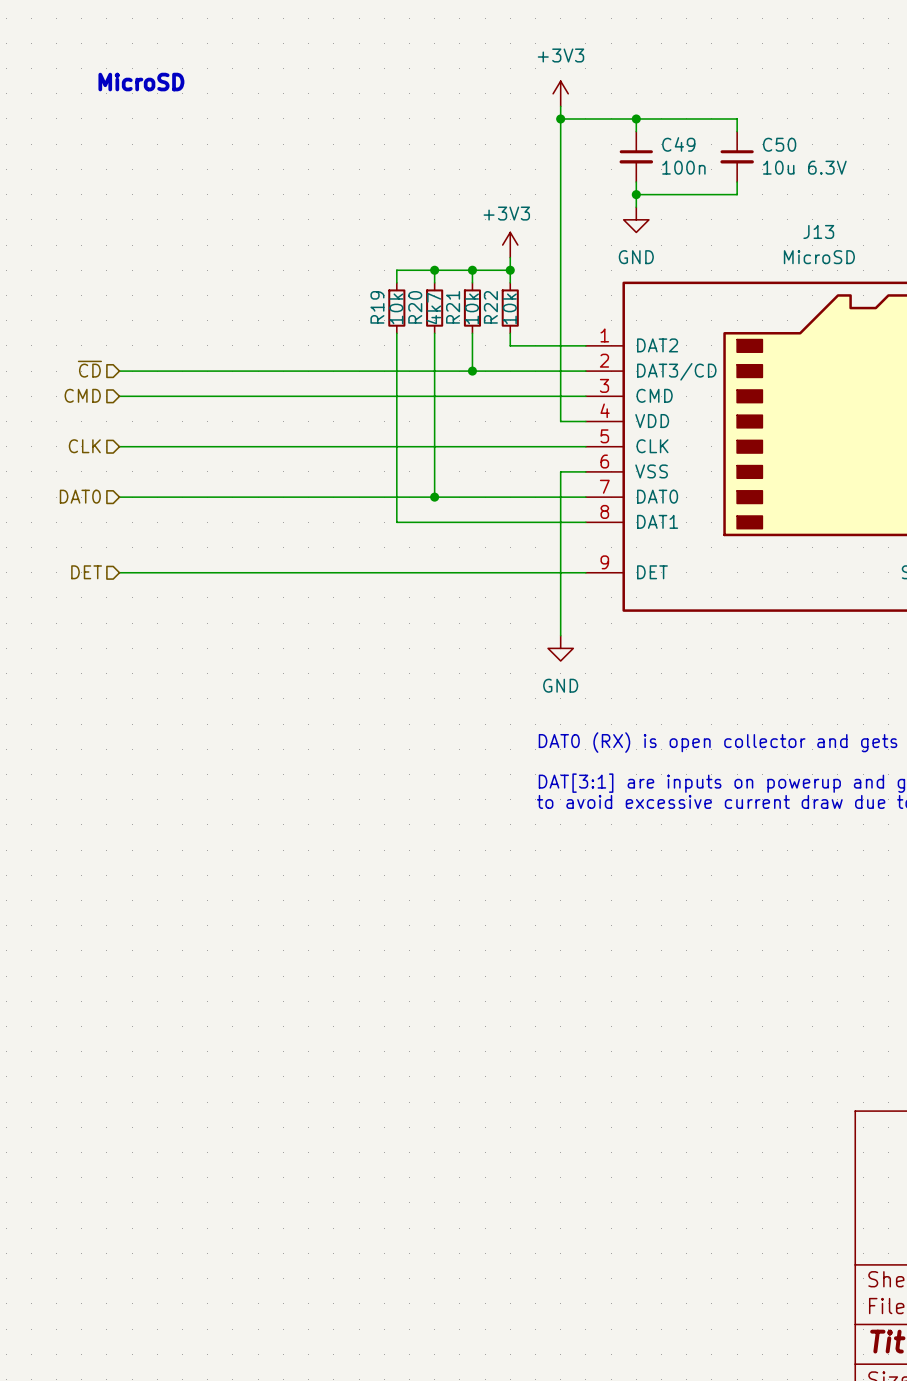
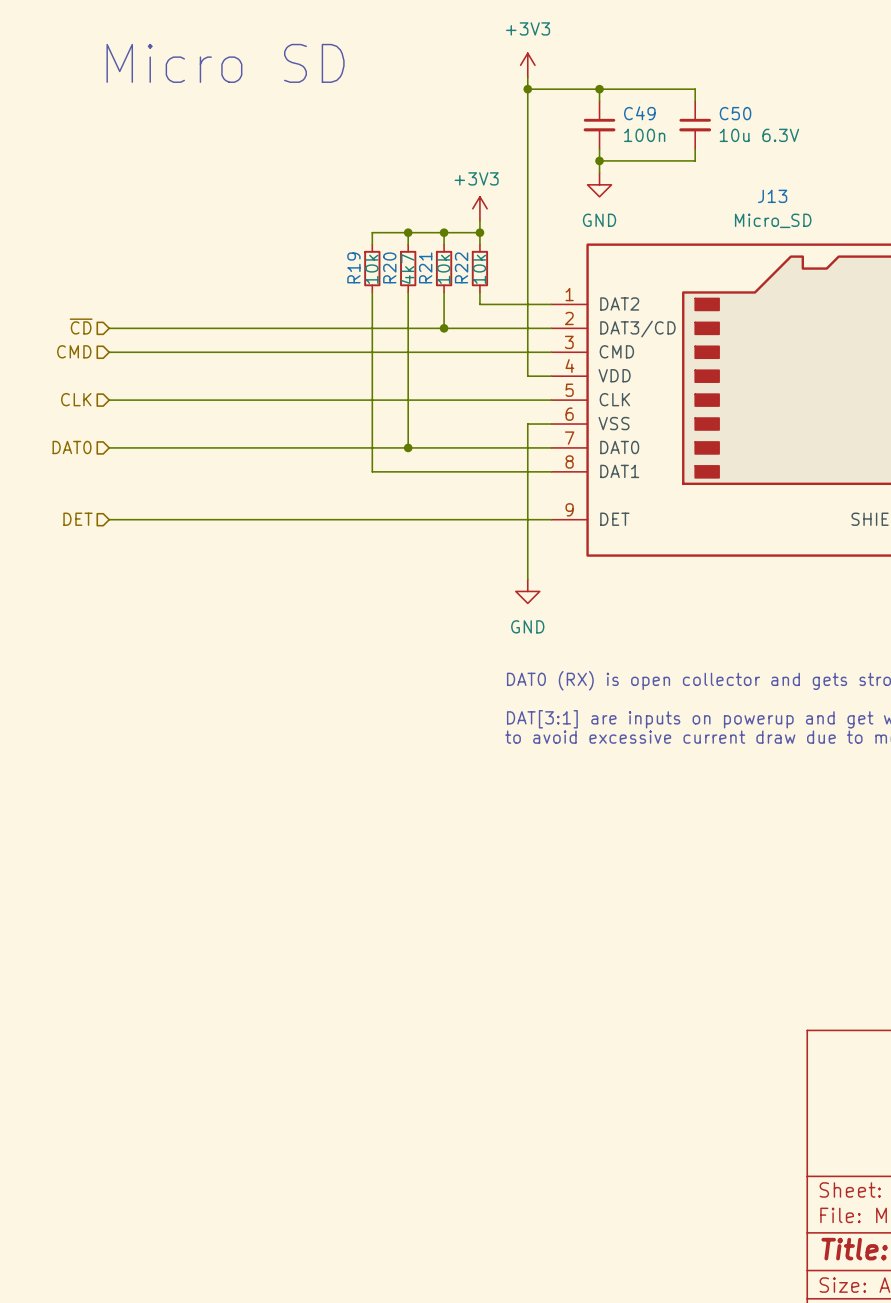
text: MicroSD (141, 82) -> Micro SD (225, 63)
J13 value: MicroSD (819, 257) -> Micro_SD (773, 220)

